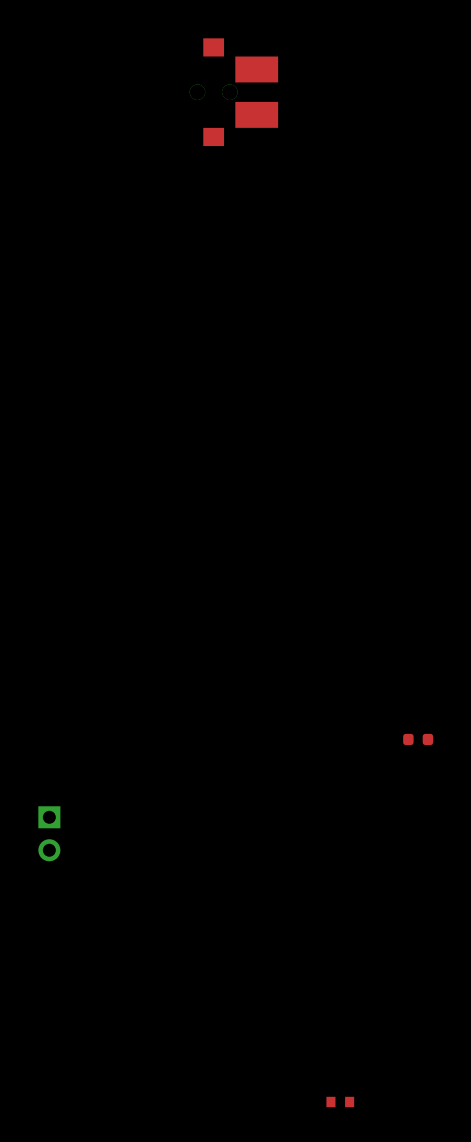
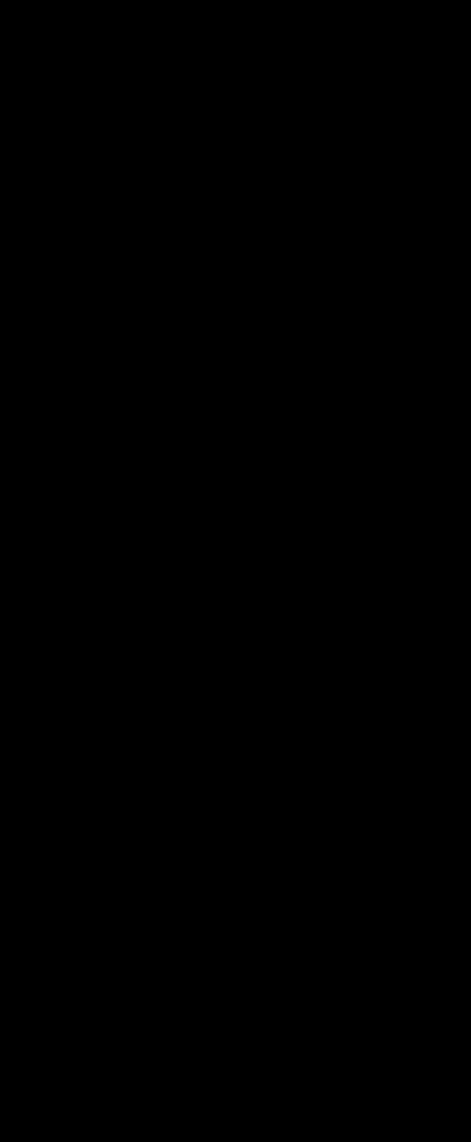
part: (233, 92) -> none
part: (418, 739) -> none
part: (49, 833) -> none
part: (340, 1101) -> none

